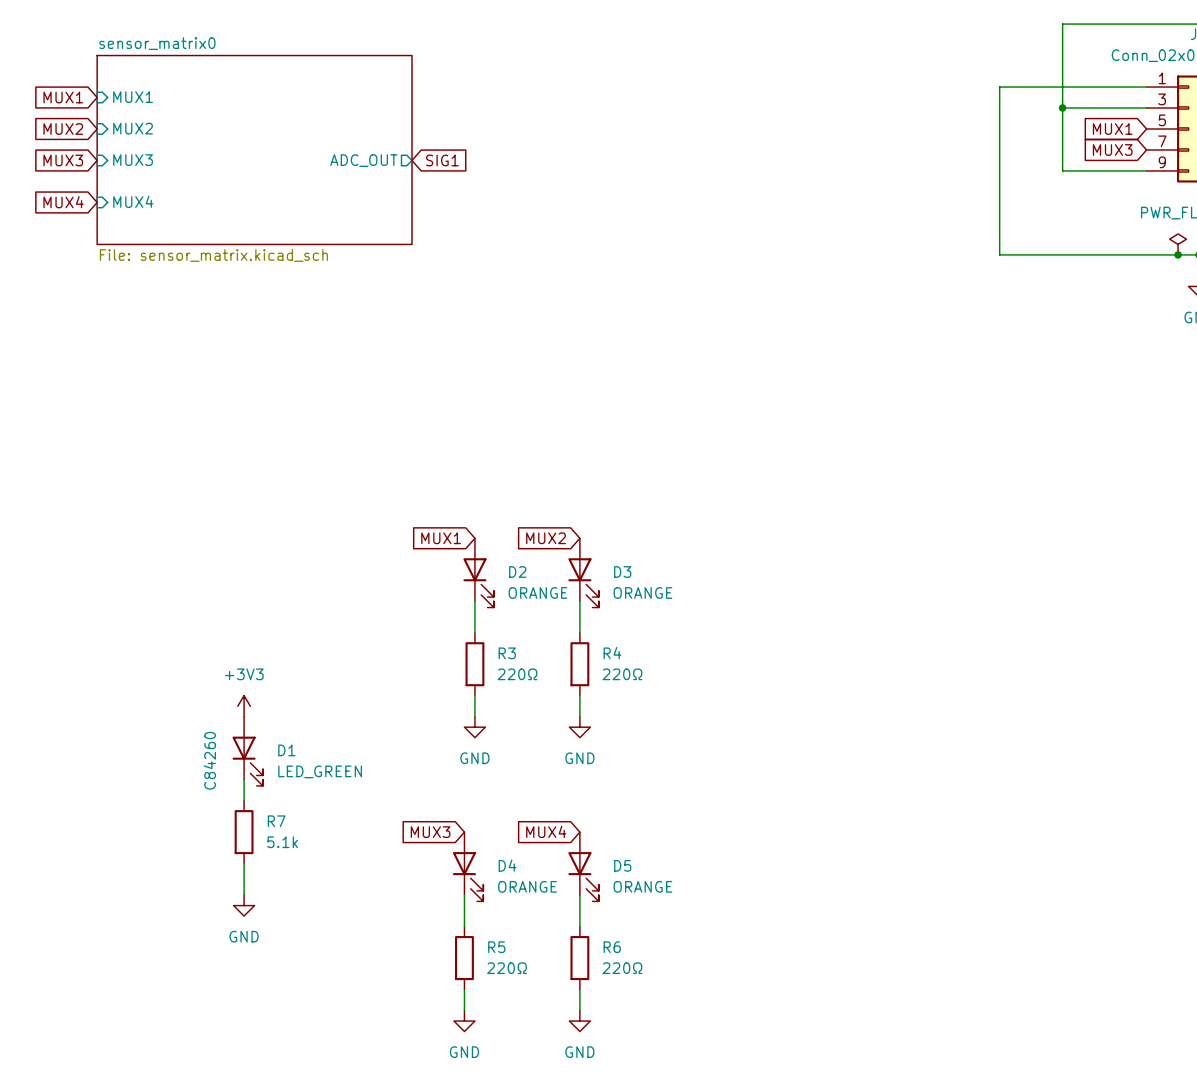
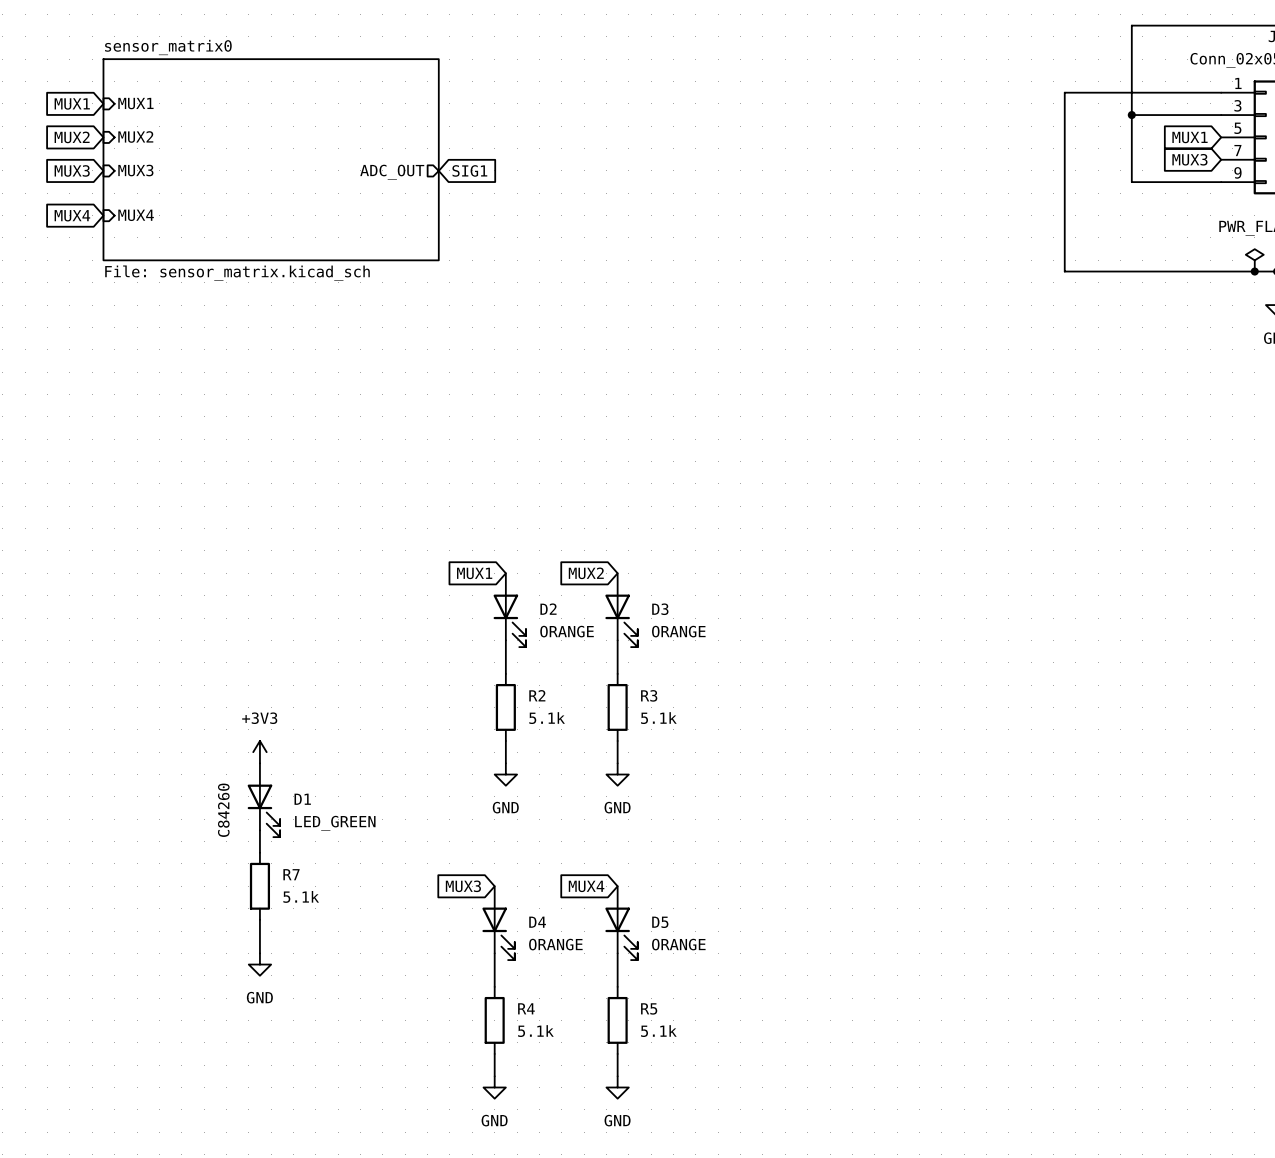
R3 name: R3 (507, 653) -> R2 (537, 695)
R4 name: R4 (612, 653) -> R3 (649, 695)
R3 value: 220Ω (517, 674) -> 5.1k (547, 718)
R4 value: 220Ω (622, 674) -> 5.1k (658, 718)
R5 name: R5 (496, 947) -> R4 (526, 1008)
R6 name: R6 (612, 947) -> R5 (649, 1008)
R5 value: 220Ω (507, 968) -> 5.1k (535, 1031)
R6 value: 220Ω (622, 968) -> 5.1k (658, 1031)

